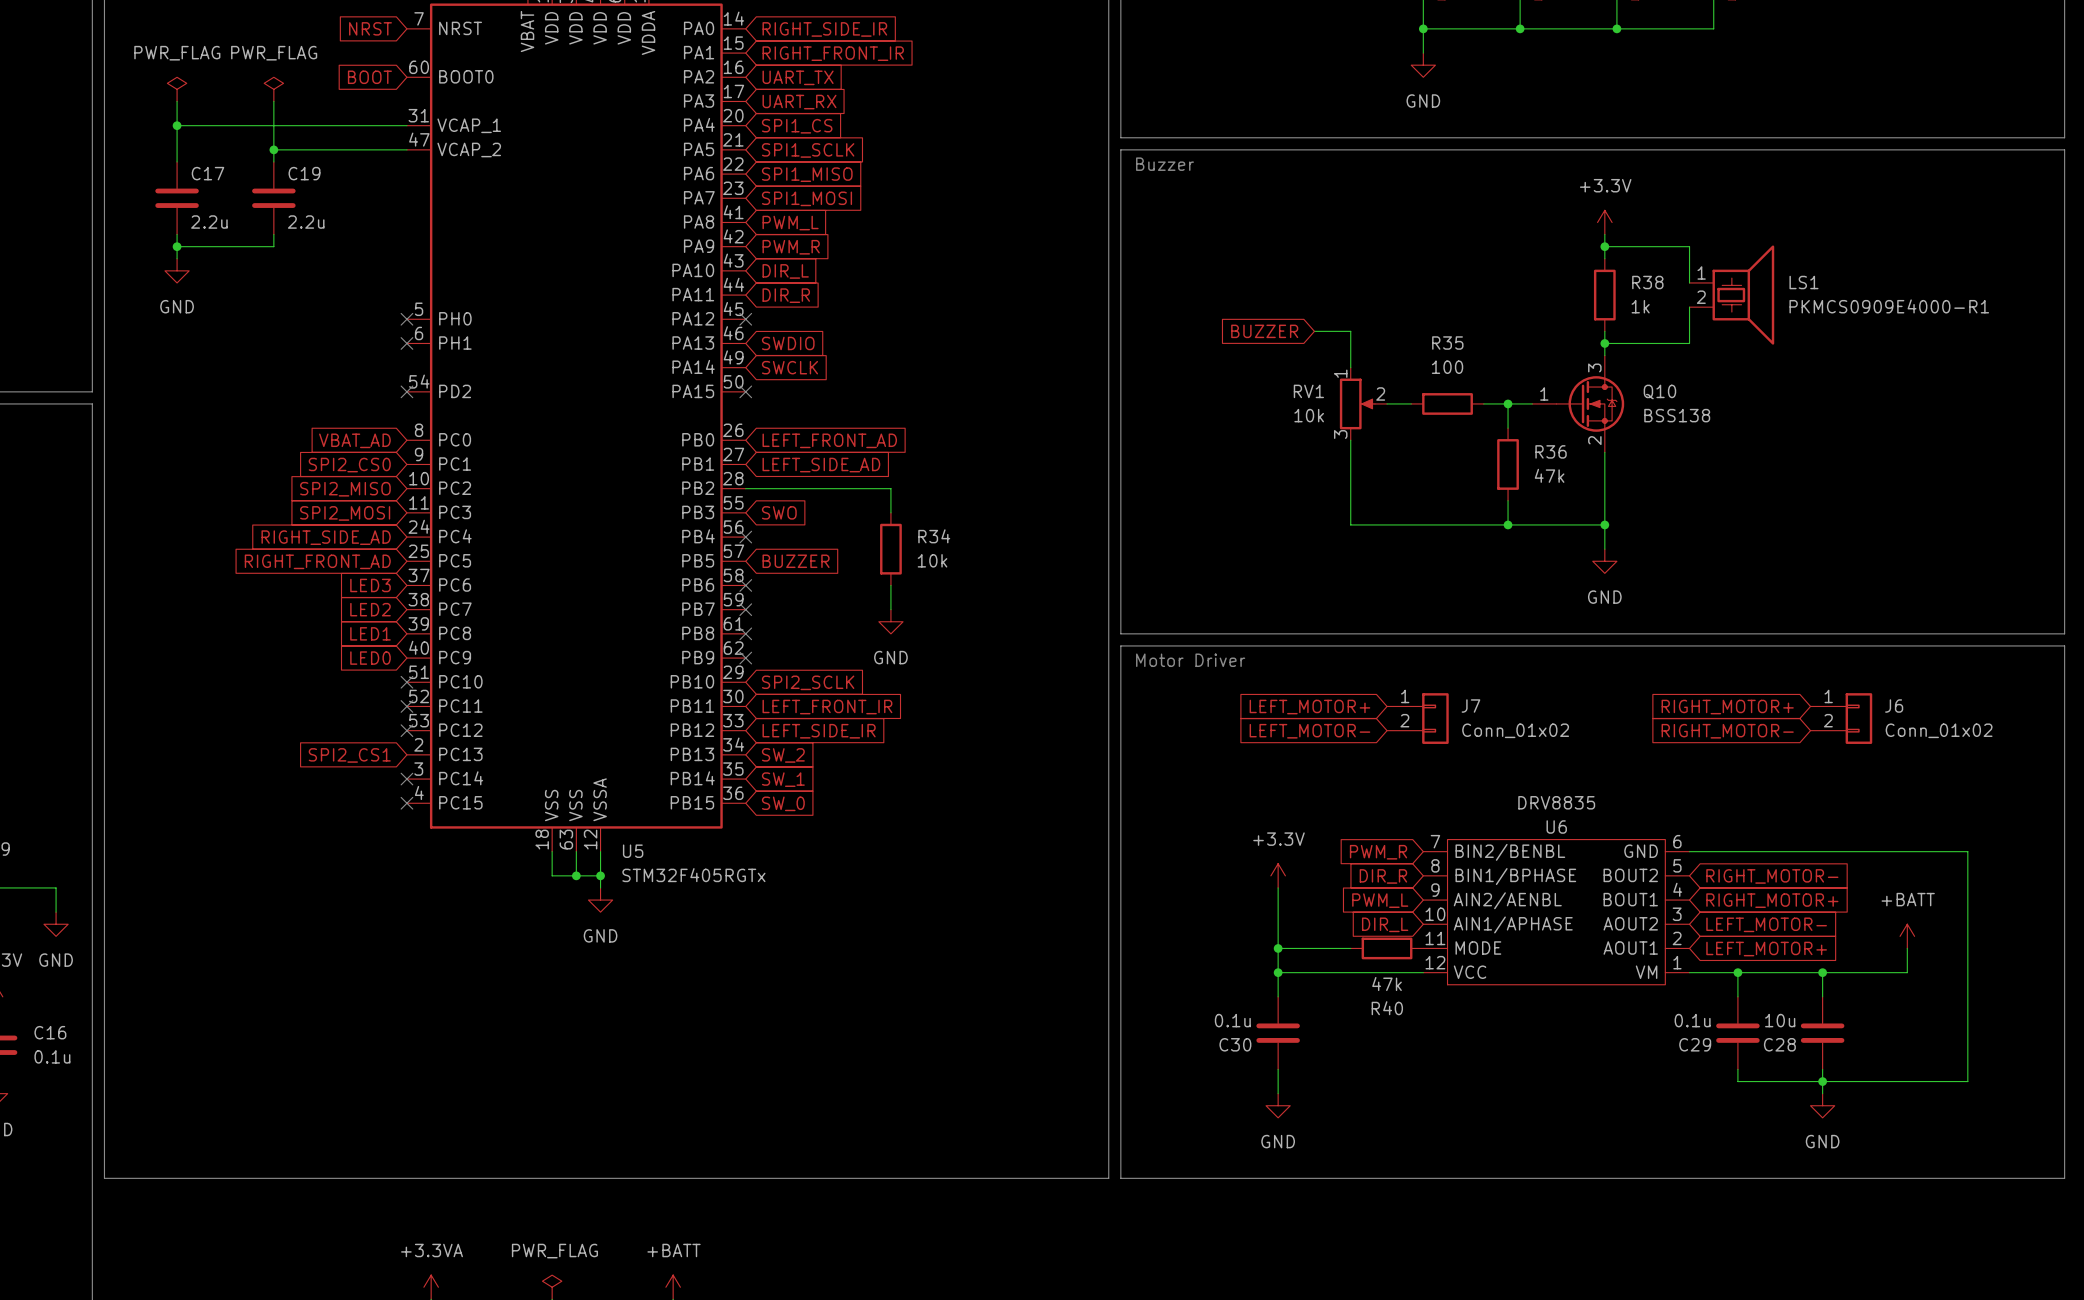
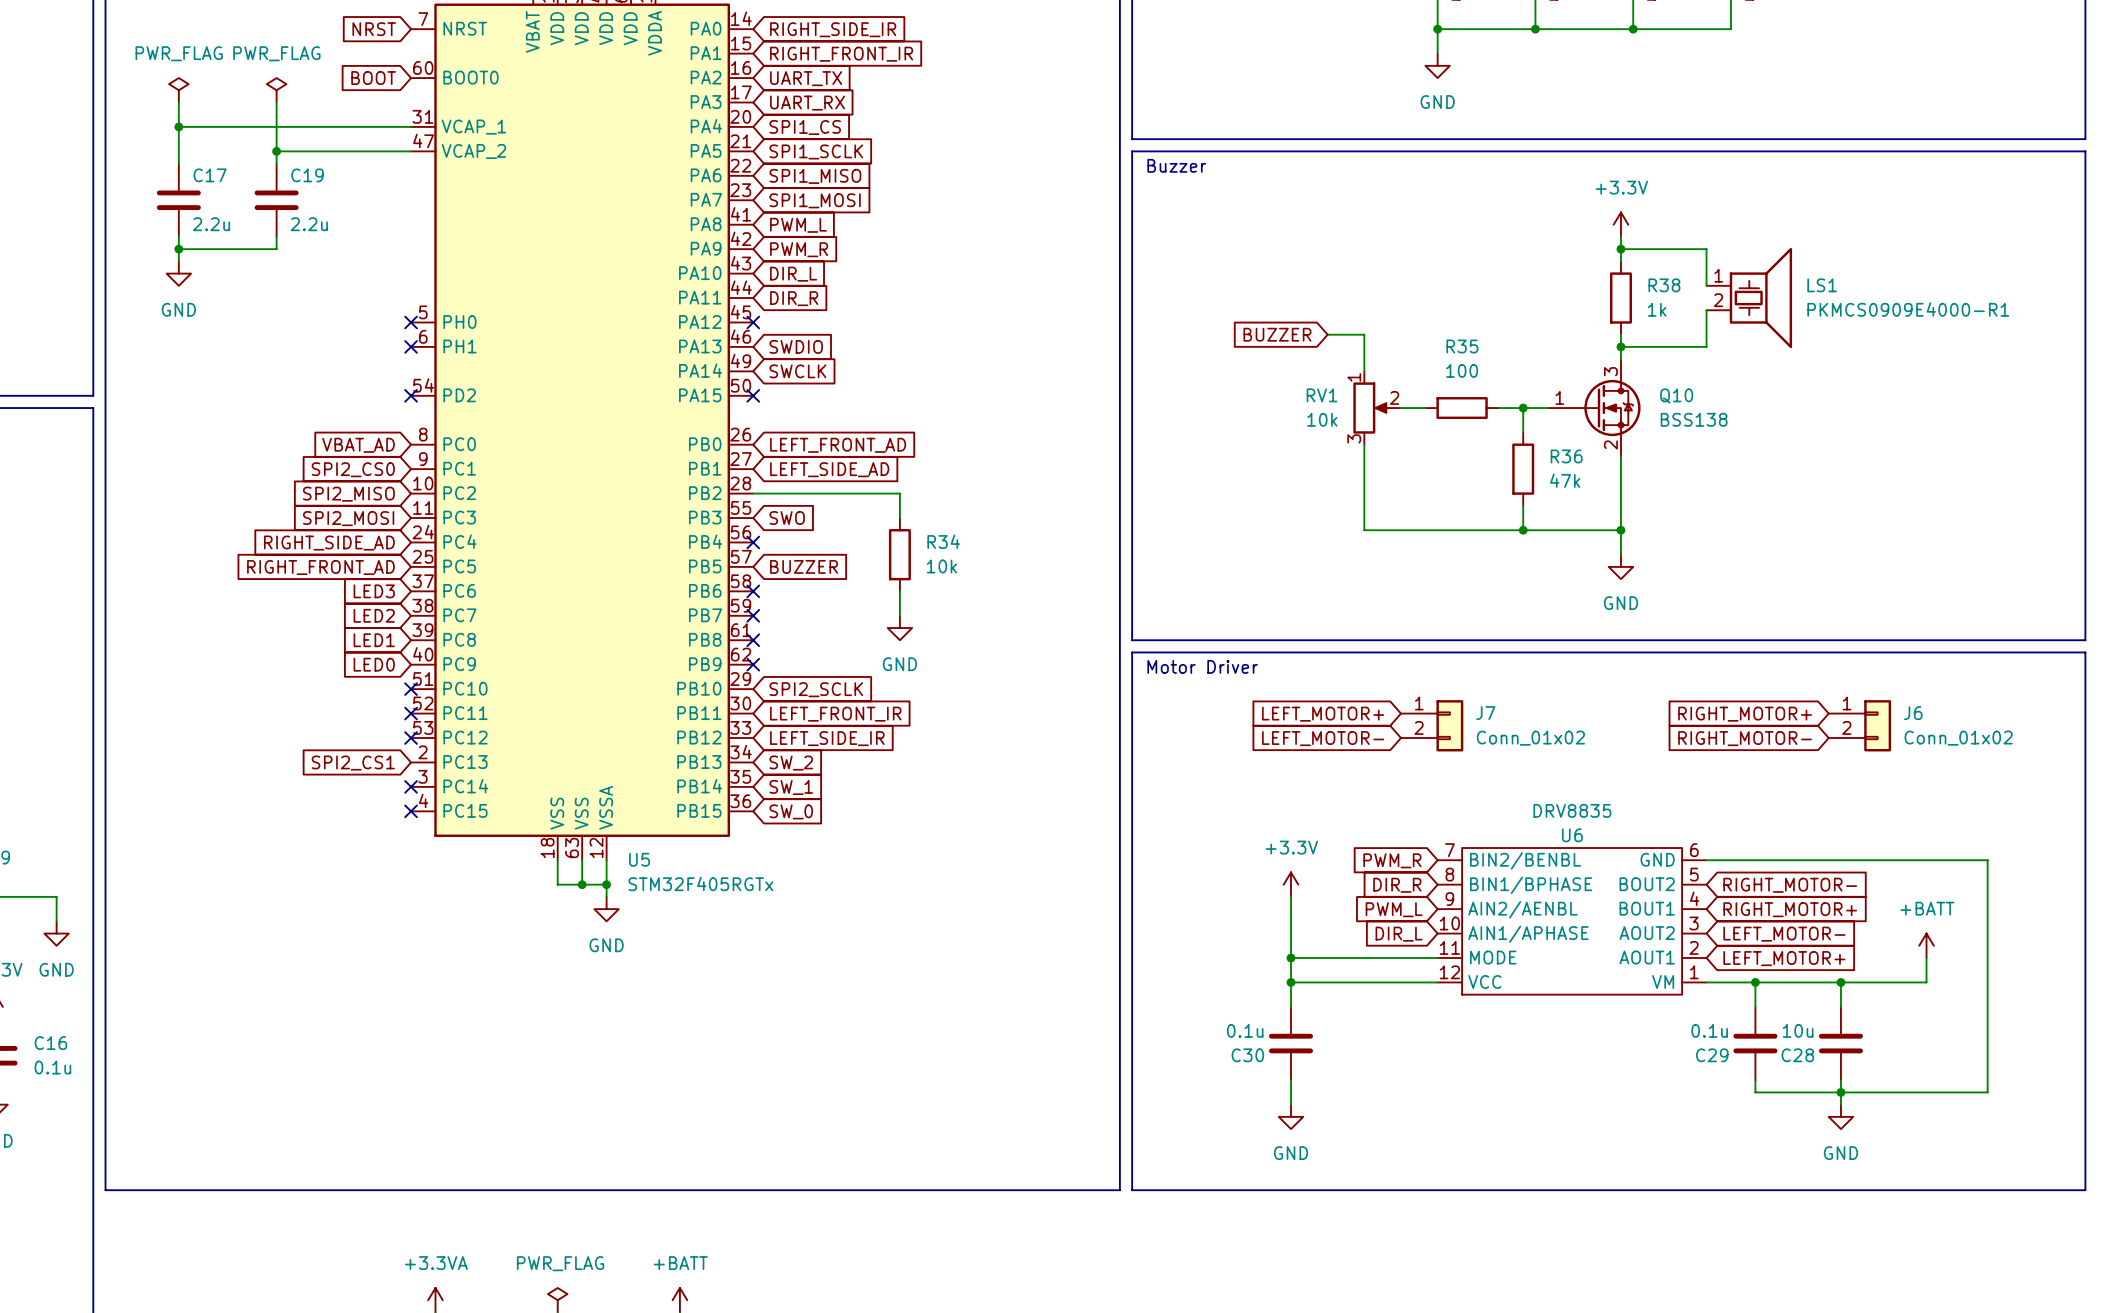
wire: none -> (1364, 958) (1437, 958)
R40: 47k (1387, 948) -> none

